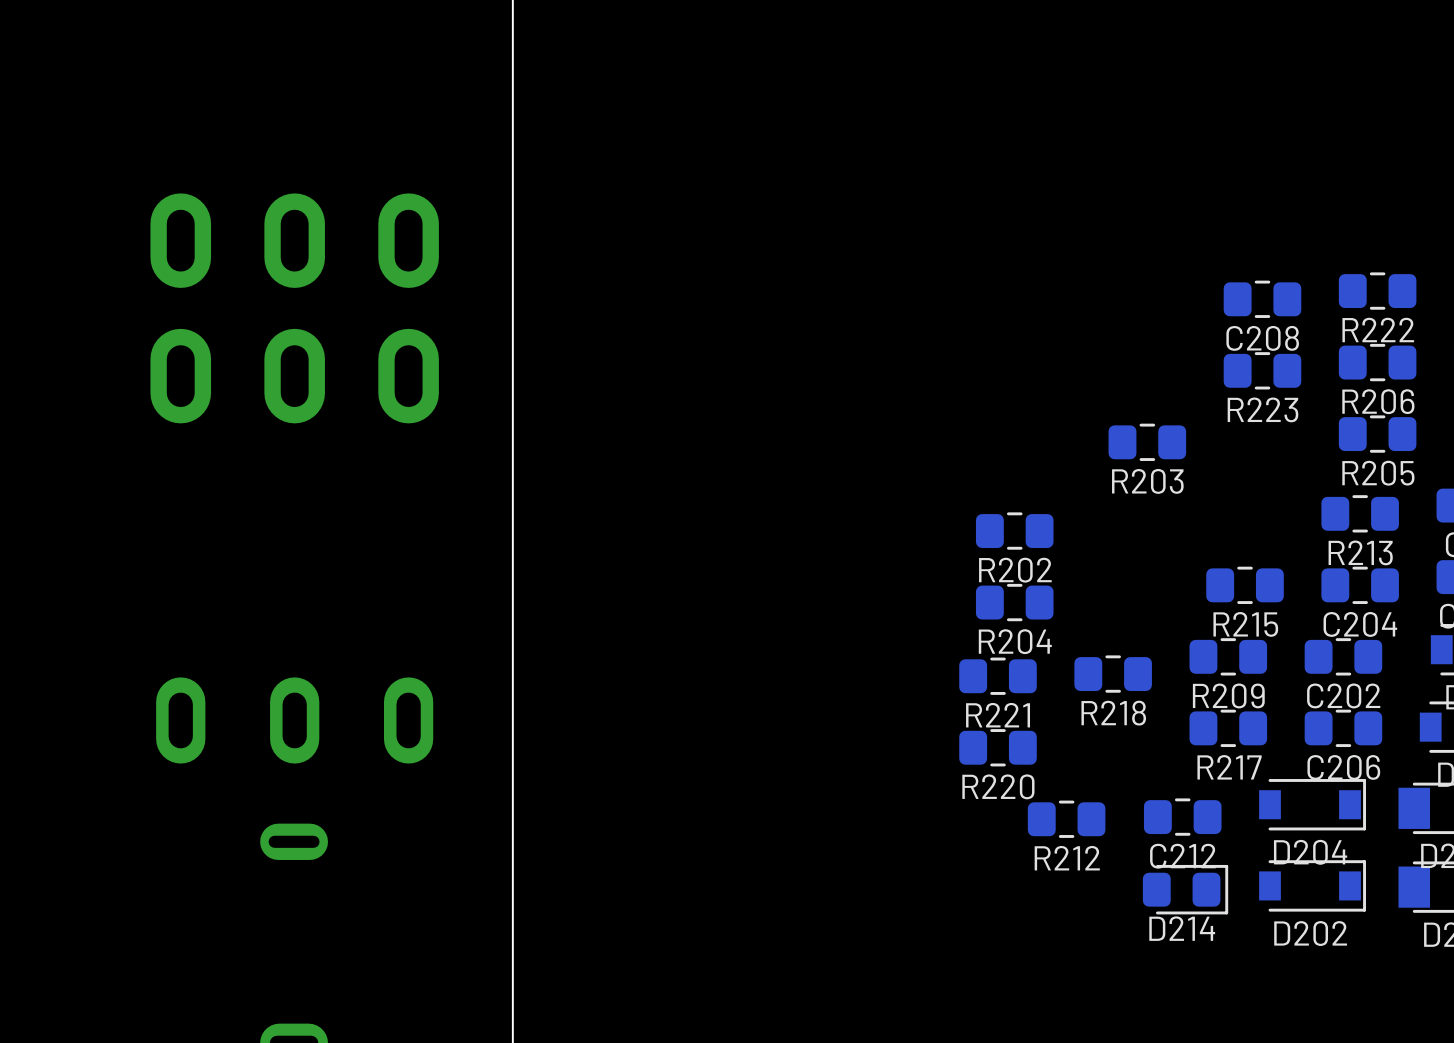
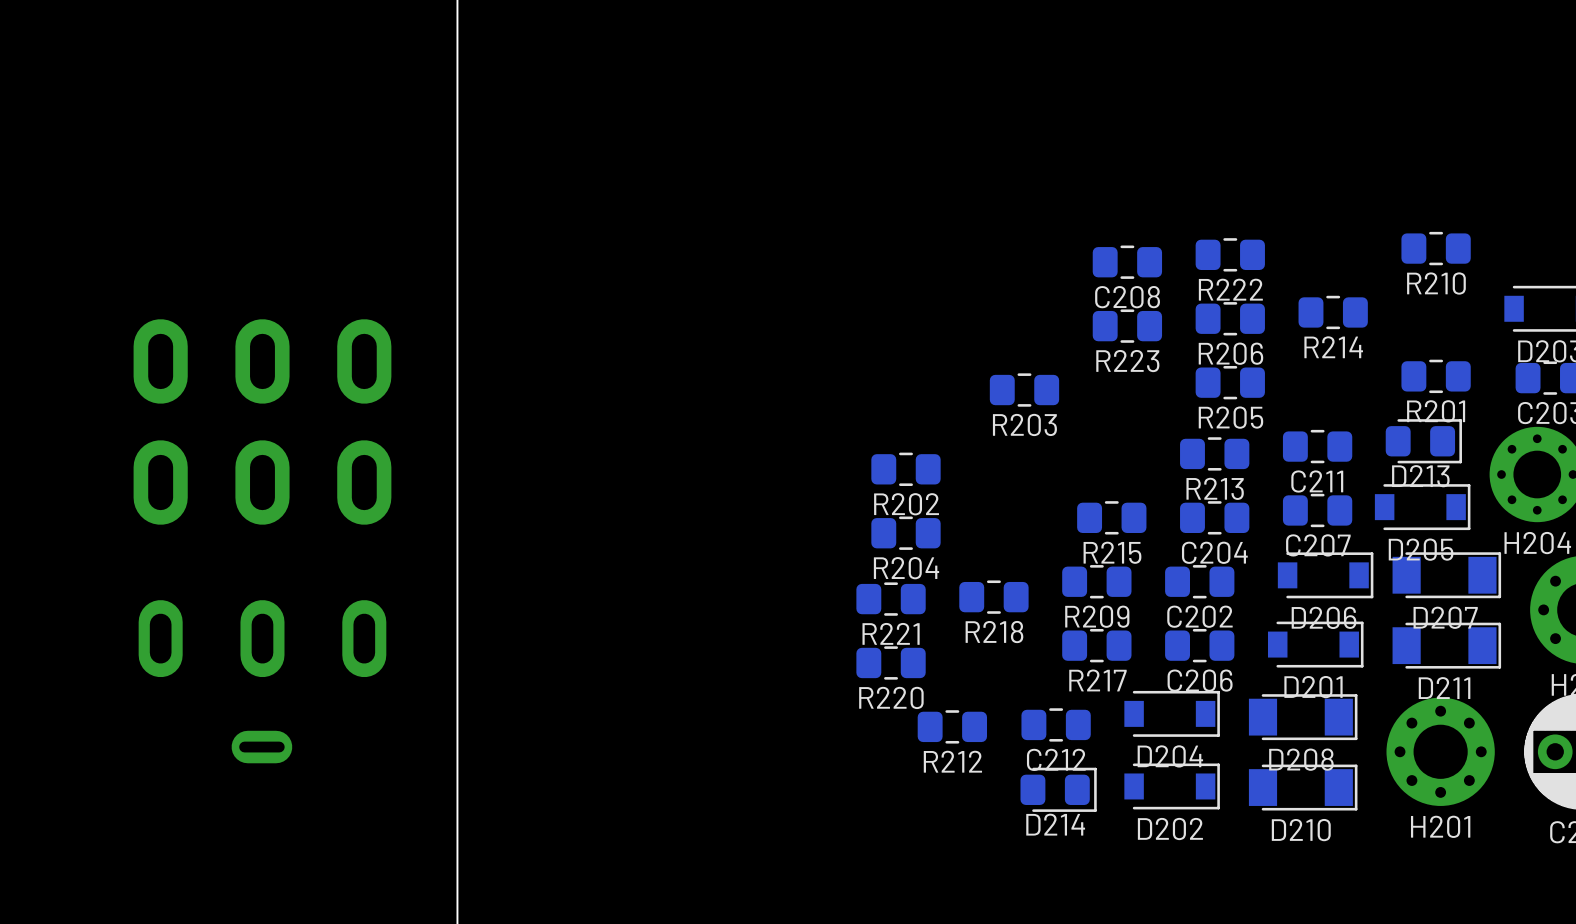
part position: (294, 308) -> (262, 421)

